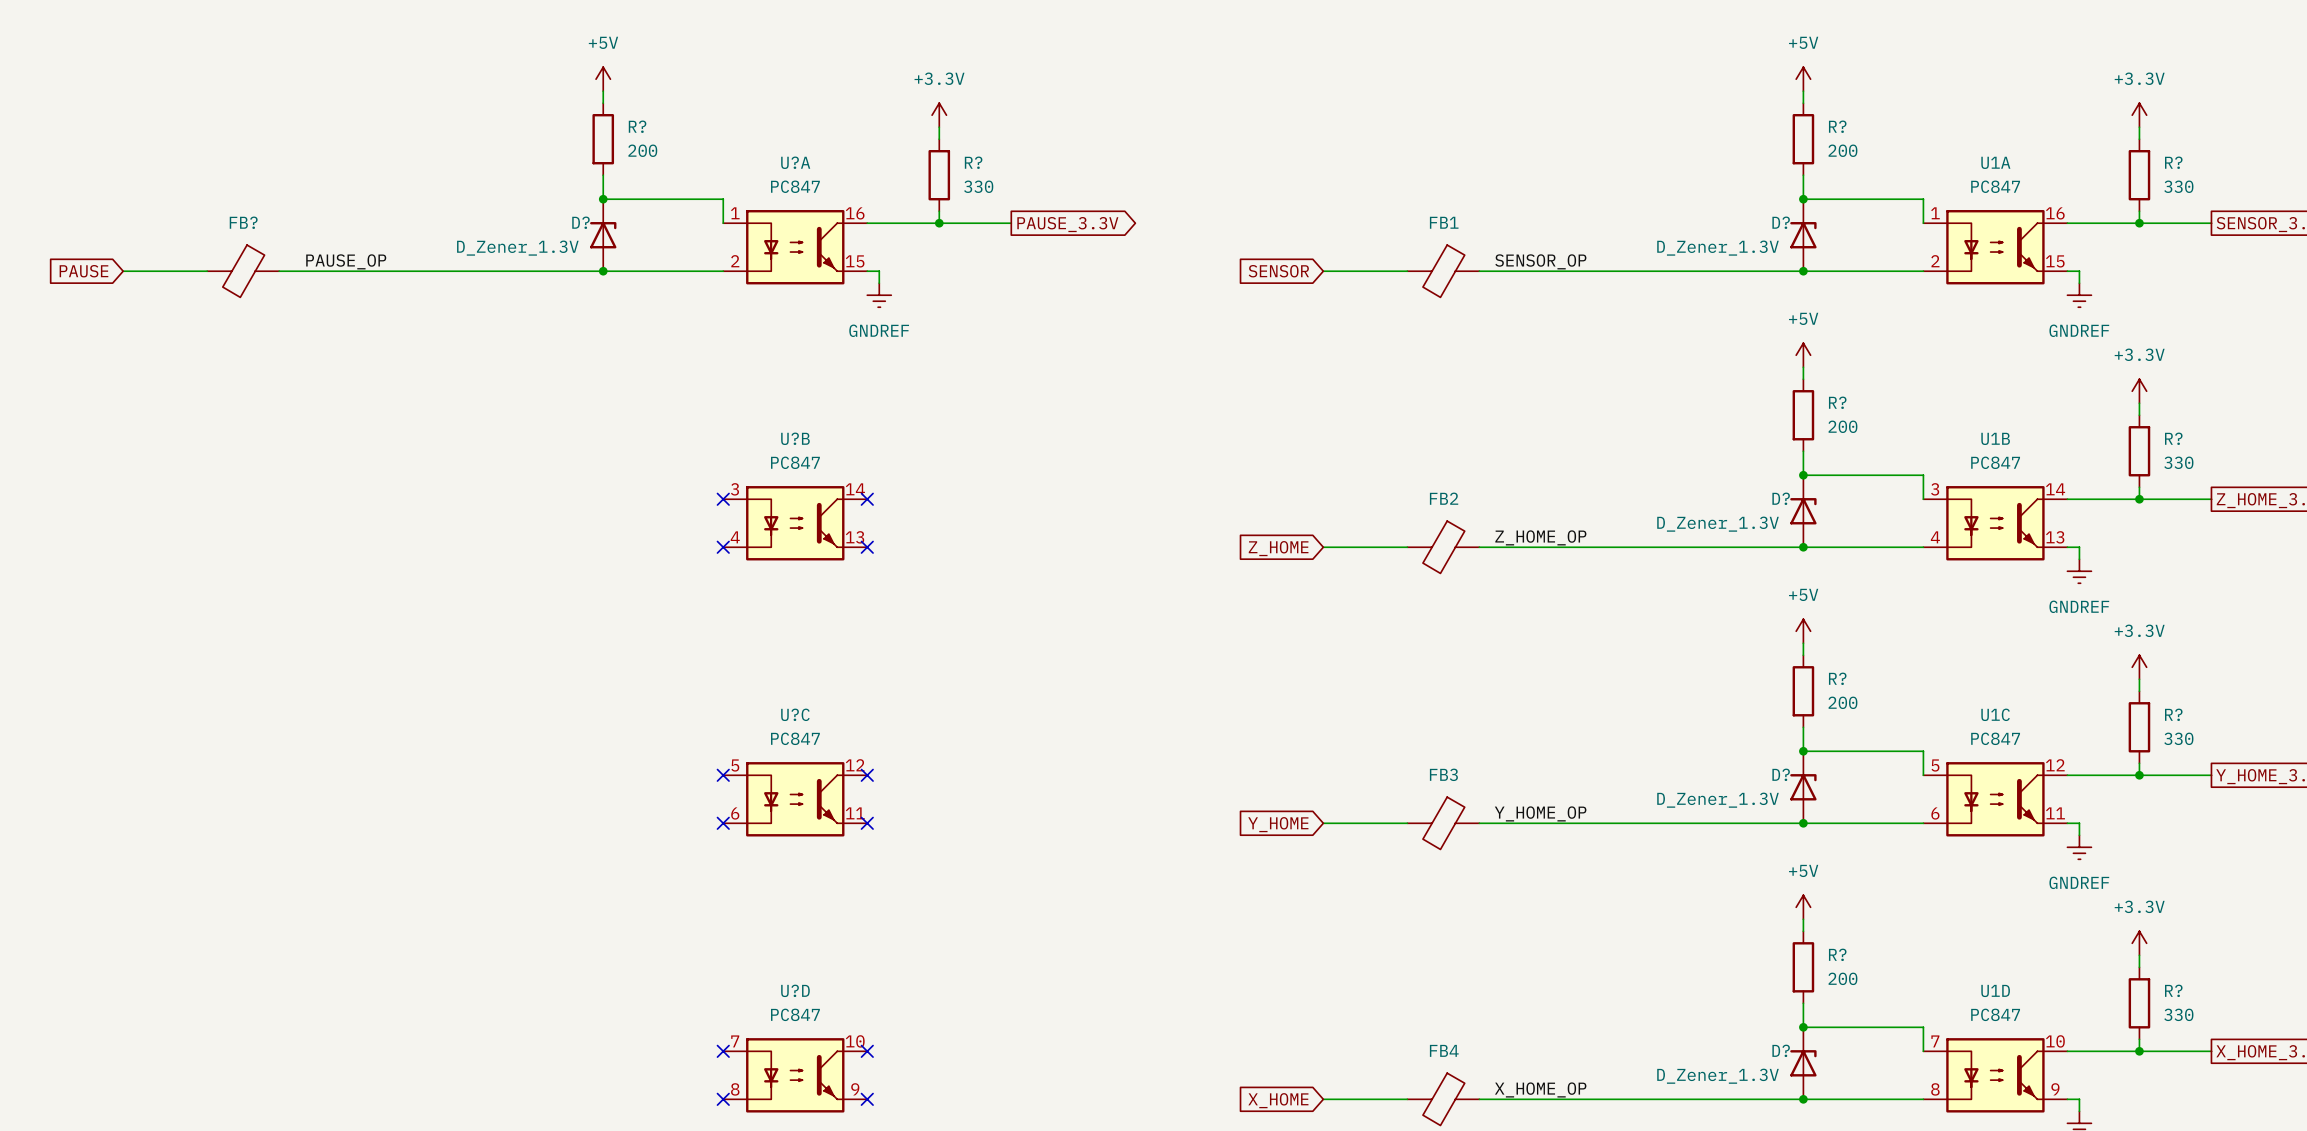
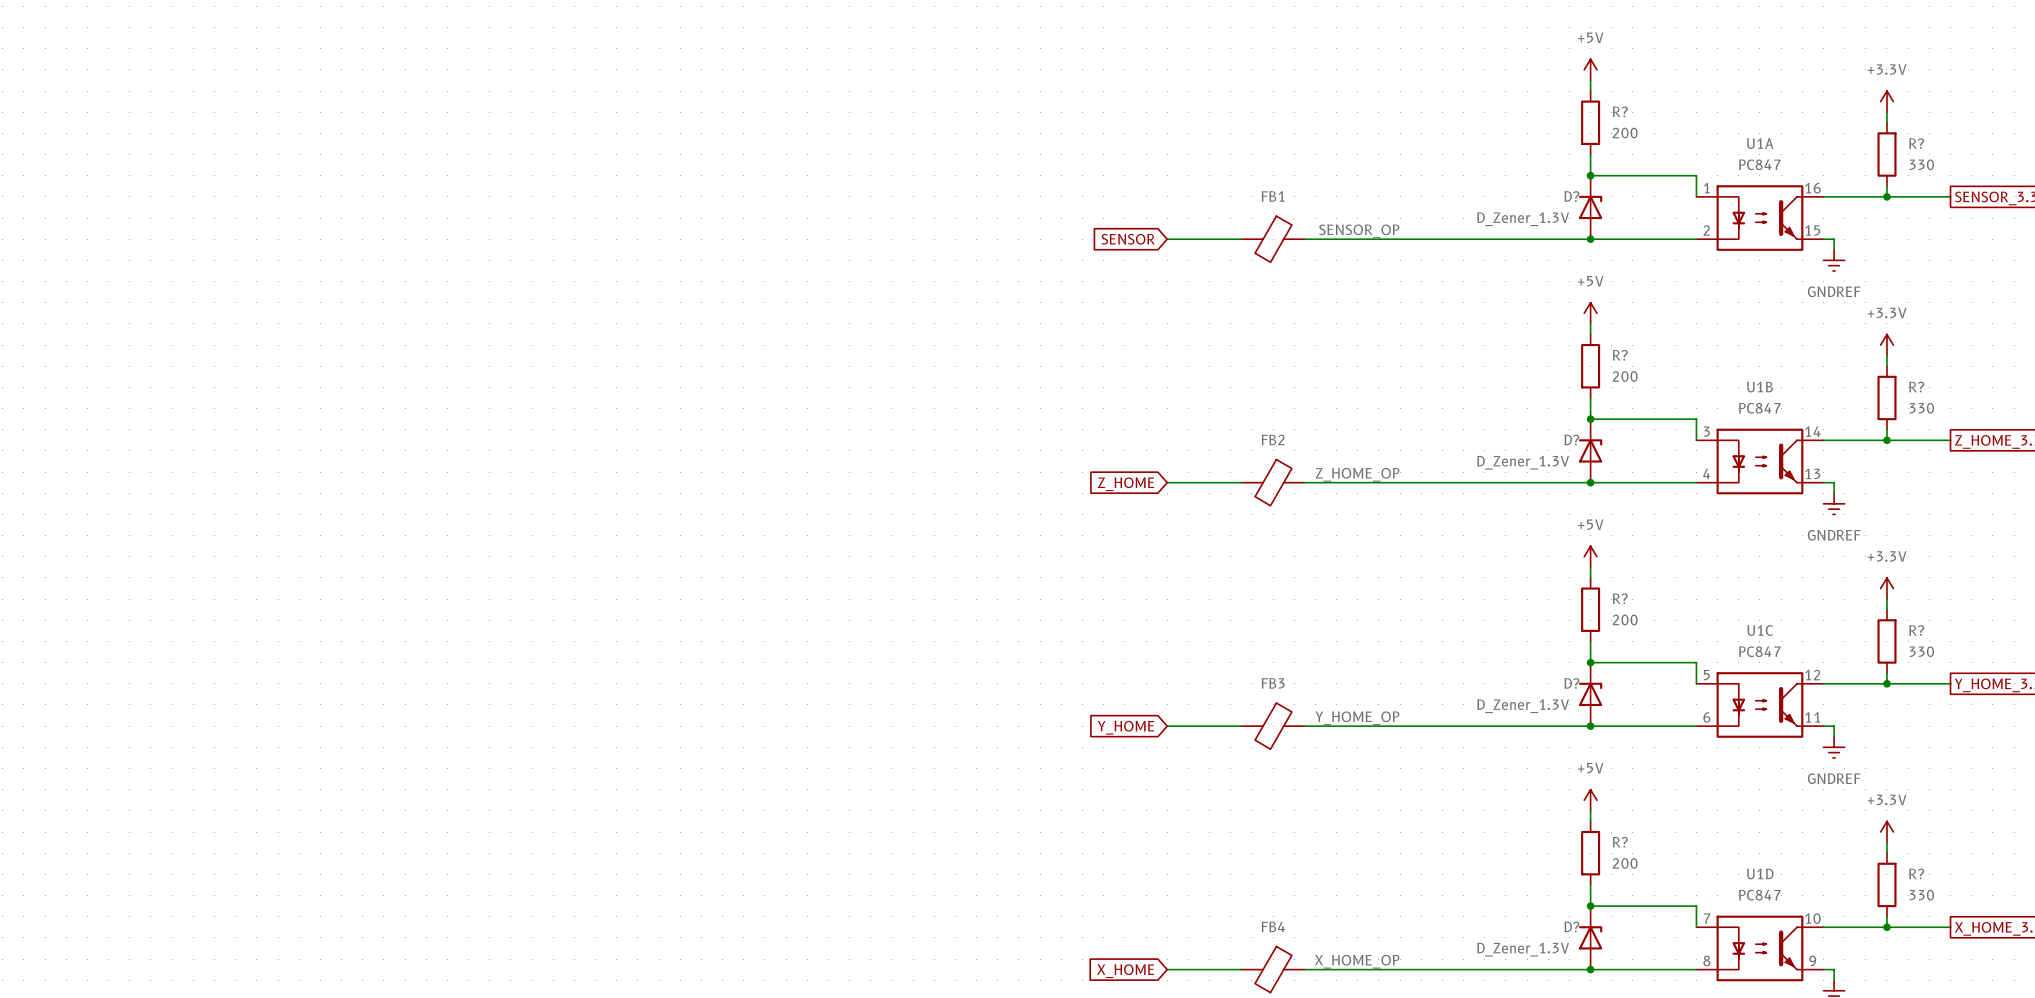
power symbol: +5V (603, 79) -> none
wire: (603, 91) (603, 103) -> none
power symbol: +3.3V (939, 115) -> none
wire: (939, 127) (939, 139) -> none
R?: 200 (603, 139) -> none
wire: (603, 175) (603, 199) (723, 199) (723, 223) -> none
R?: 330 (939, 175) -> none
junction: (603, 199) -> none
wire: (939, 211) (939, 223) -> none
wire: (867, 223) (1011, 223) -> none
junction: (939, 223) -> none
global label: PAUSE_3.3V (1067, 224) -> none
D?: D_Zener_1.3V (603, 235) -> none
U?A: PC847 (795, 247) -> none
label: PAUSE_OP (346, 261) -> none
global label: PAUSE (83, 271) -> none
wire: (123, 271) (207, 271) -> none
FB?: (243, 271) -> none
wire: (279, 271) (723, 271) -> none
junction: (603, 271) -> none
wire: (867, 271) (879, 271) (879, 283) -> none
power symbol: GNDREF (879, 295) -> none
no-connect mark: (723, 499) -> none
no-connect mark: (867, 499) -> none
U?B: PC847 (795, 523) -> none
no-connect mark: (723, 547) -> none
no-connect mark: (867, 547) -> none
no-connect mark: (723, 775) -> none
no-connect mark: (867, 775) -> none
U?C: PC847 (795, 799) -> none
no-connect mark: (723, 823) -> none
no-connect mark: (867, 823) -> none
no-connect mark: (723, 1051) -> none
no-connect mark: (867, 1051) -> none
U?D: PC847 (795, 1075) -> none
no-connect mark: (723, 1099) -> none
no-connect mark: (867, 1099) -> none

